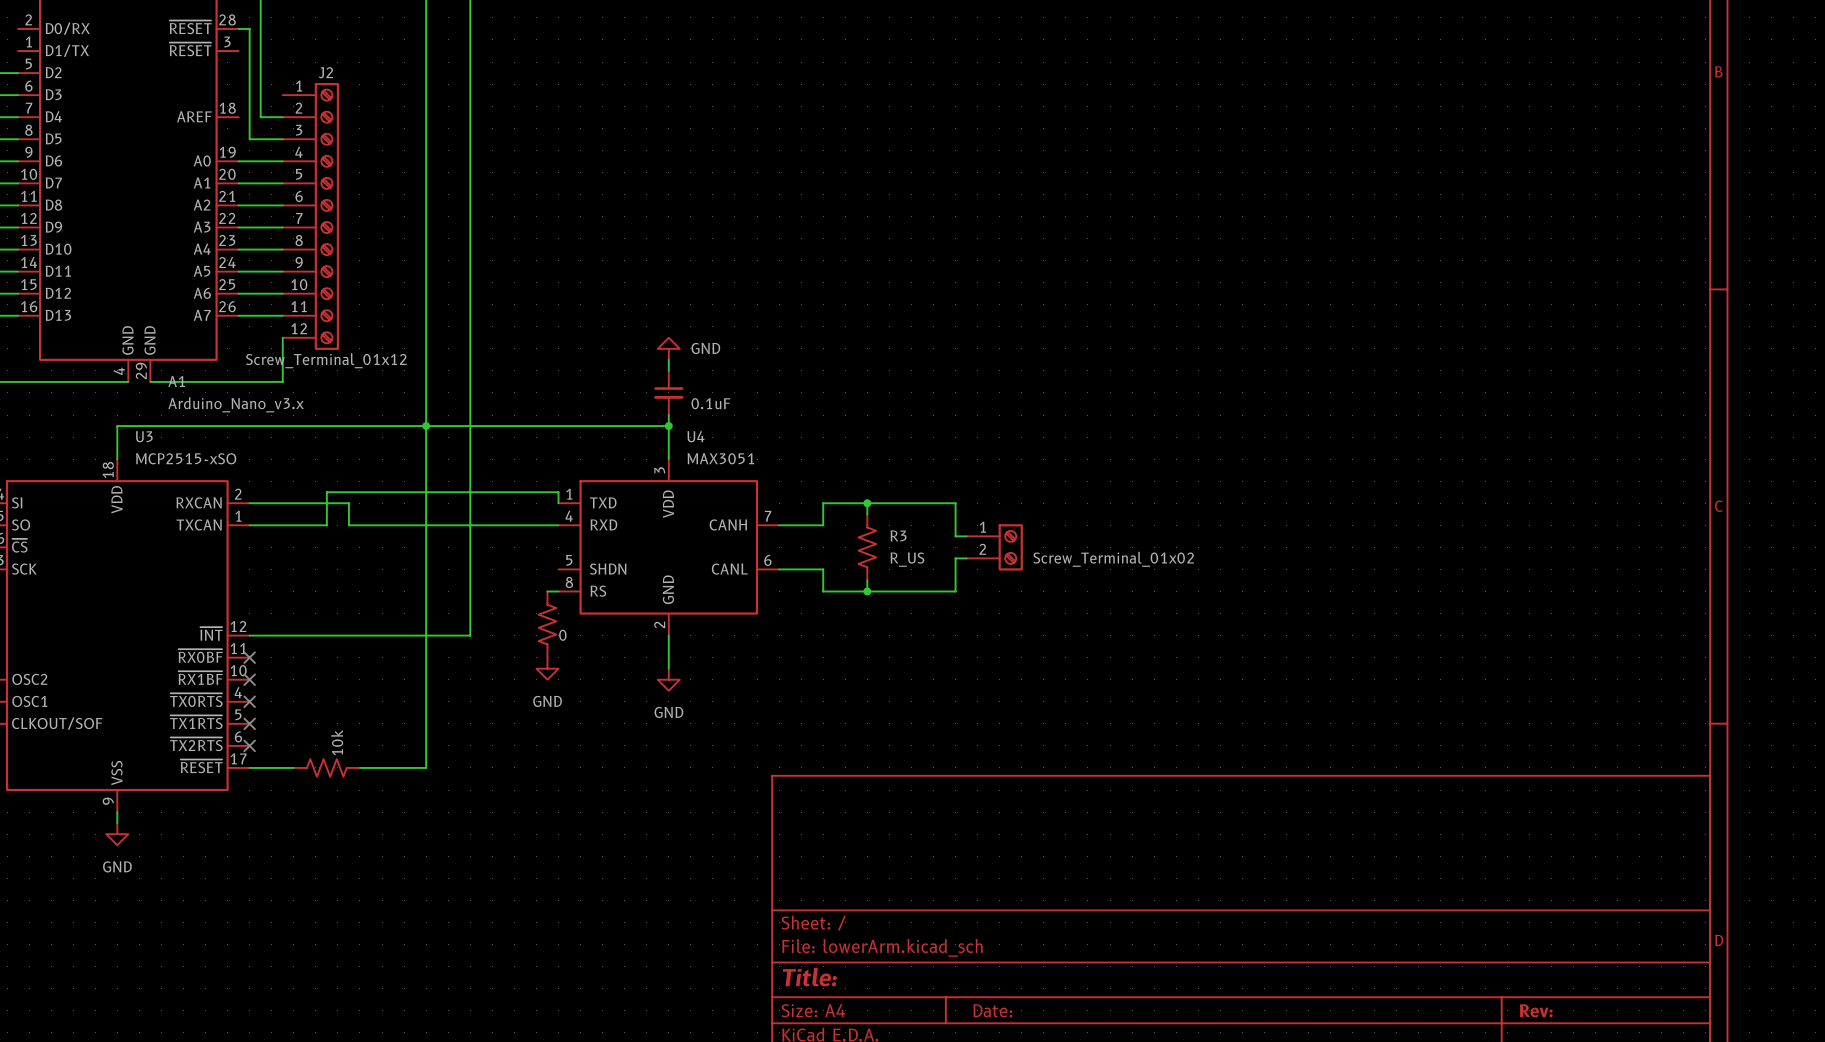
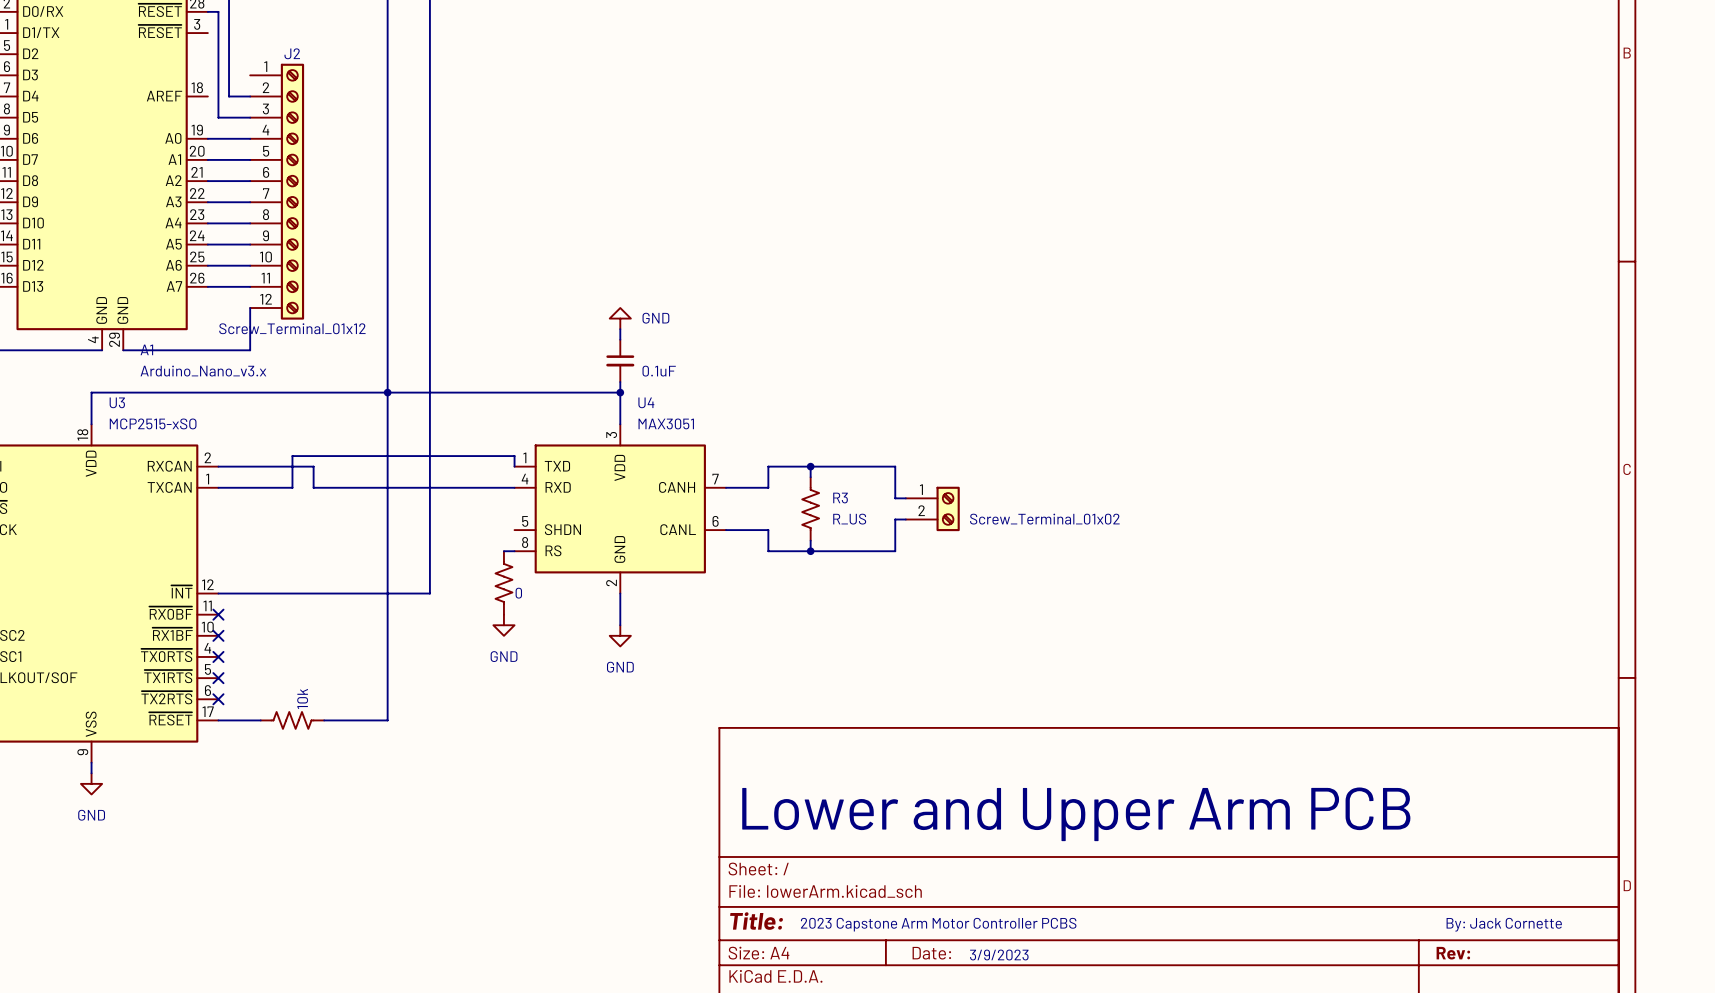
text: none -> Lower and Upper Arm PCB (1076, 814)
text: none -> 2023 Capstone Arm Motor Controller PCBS (938, 924)
text: none -> By: Jack Cornette (1504, 924)
text: none -> 3/9/2023 (999, 955)

